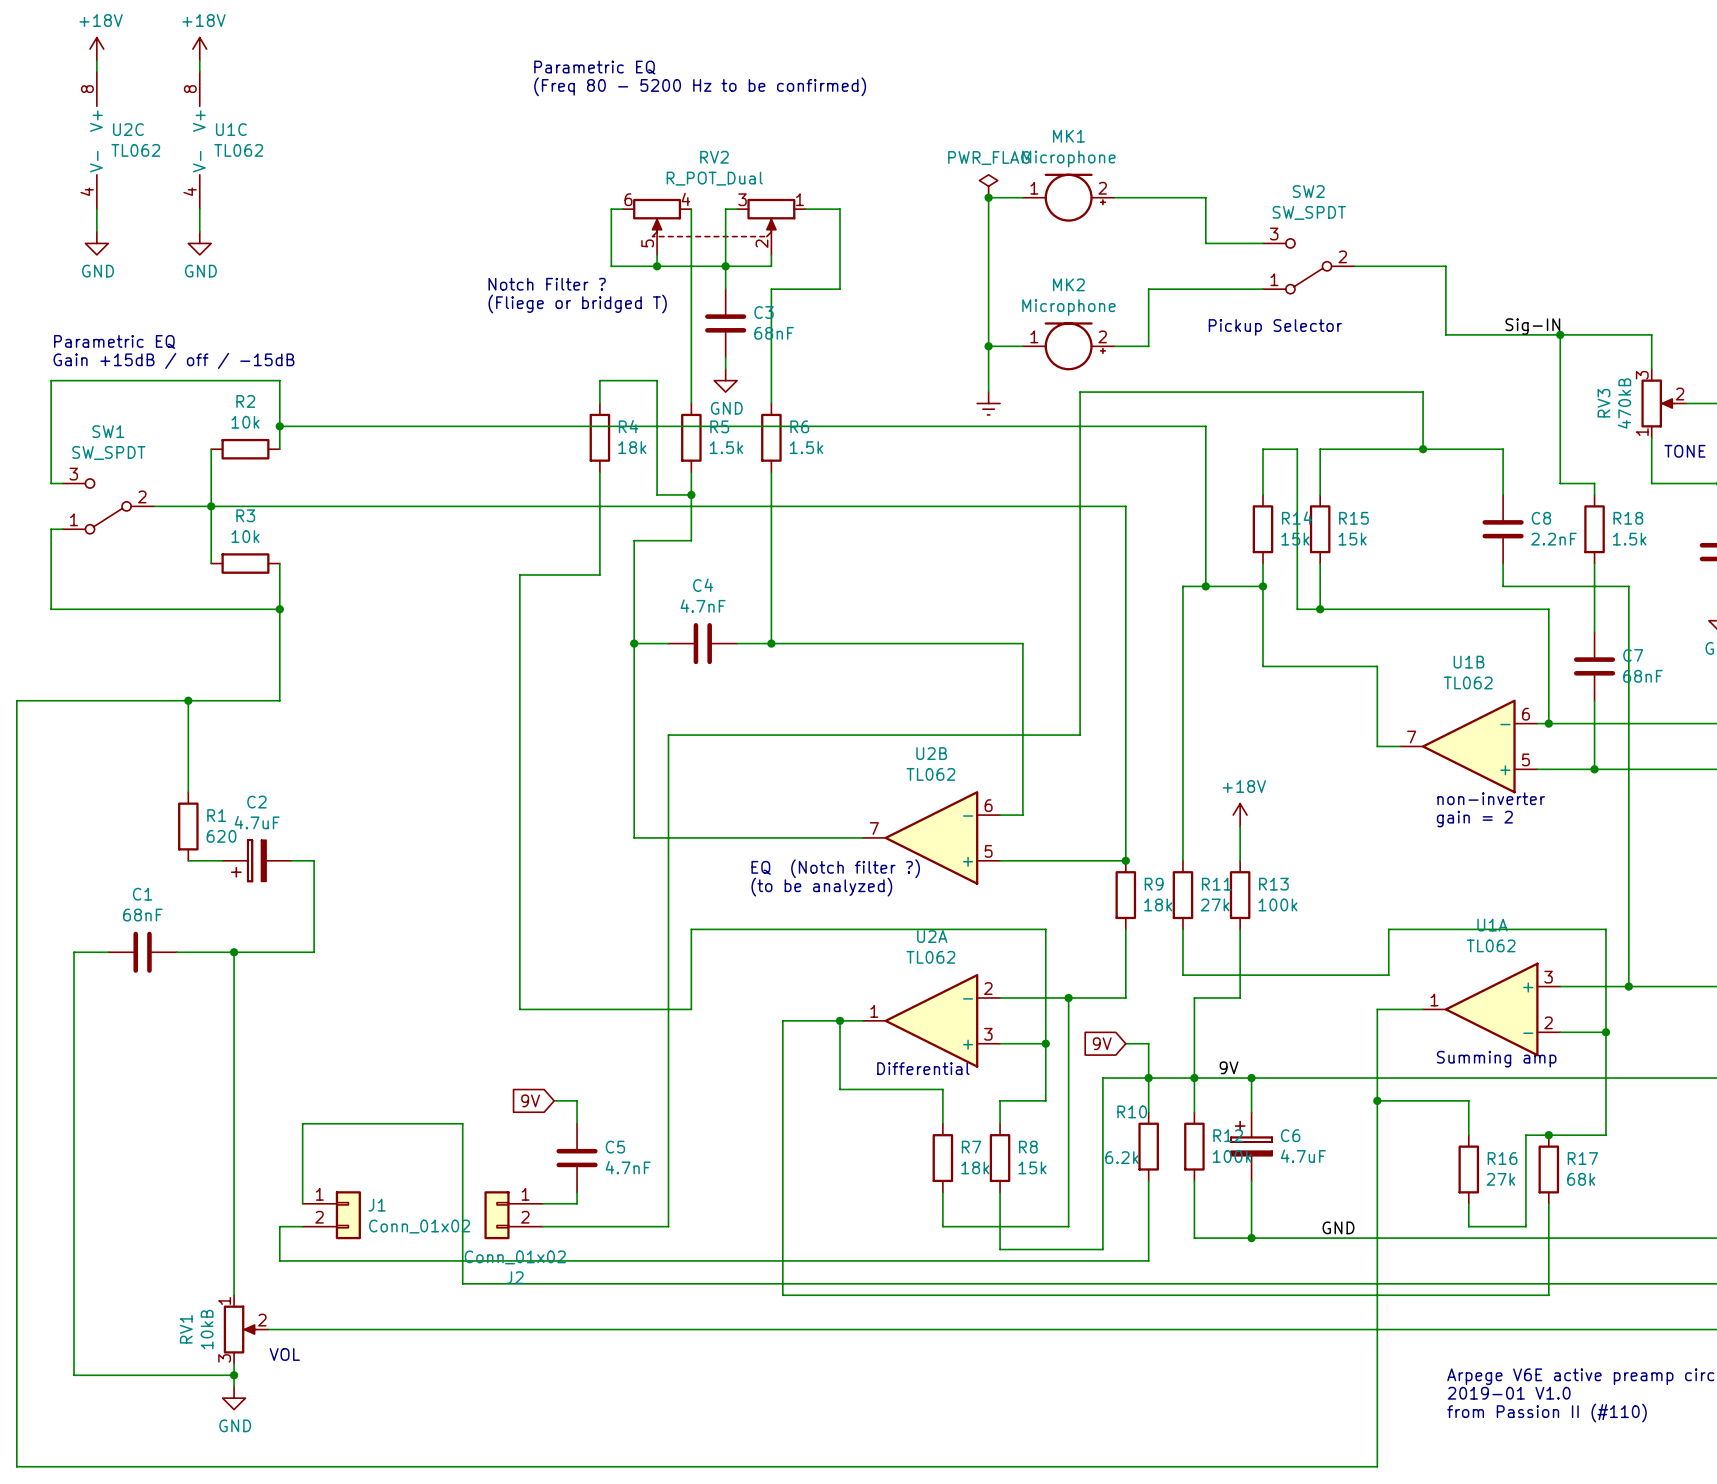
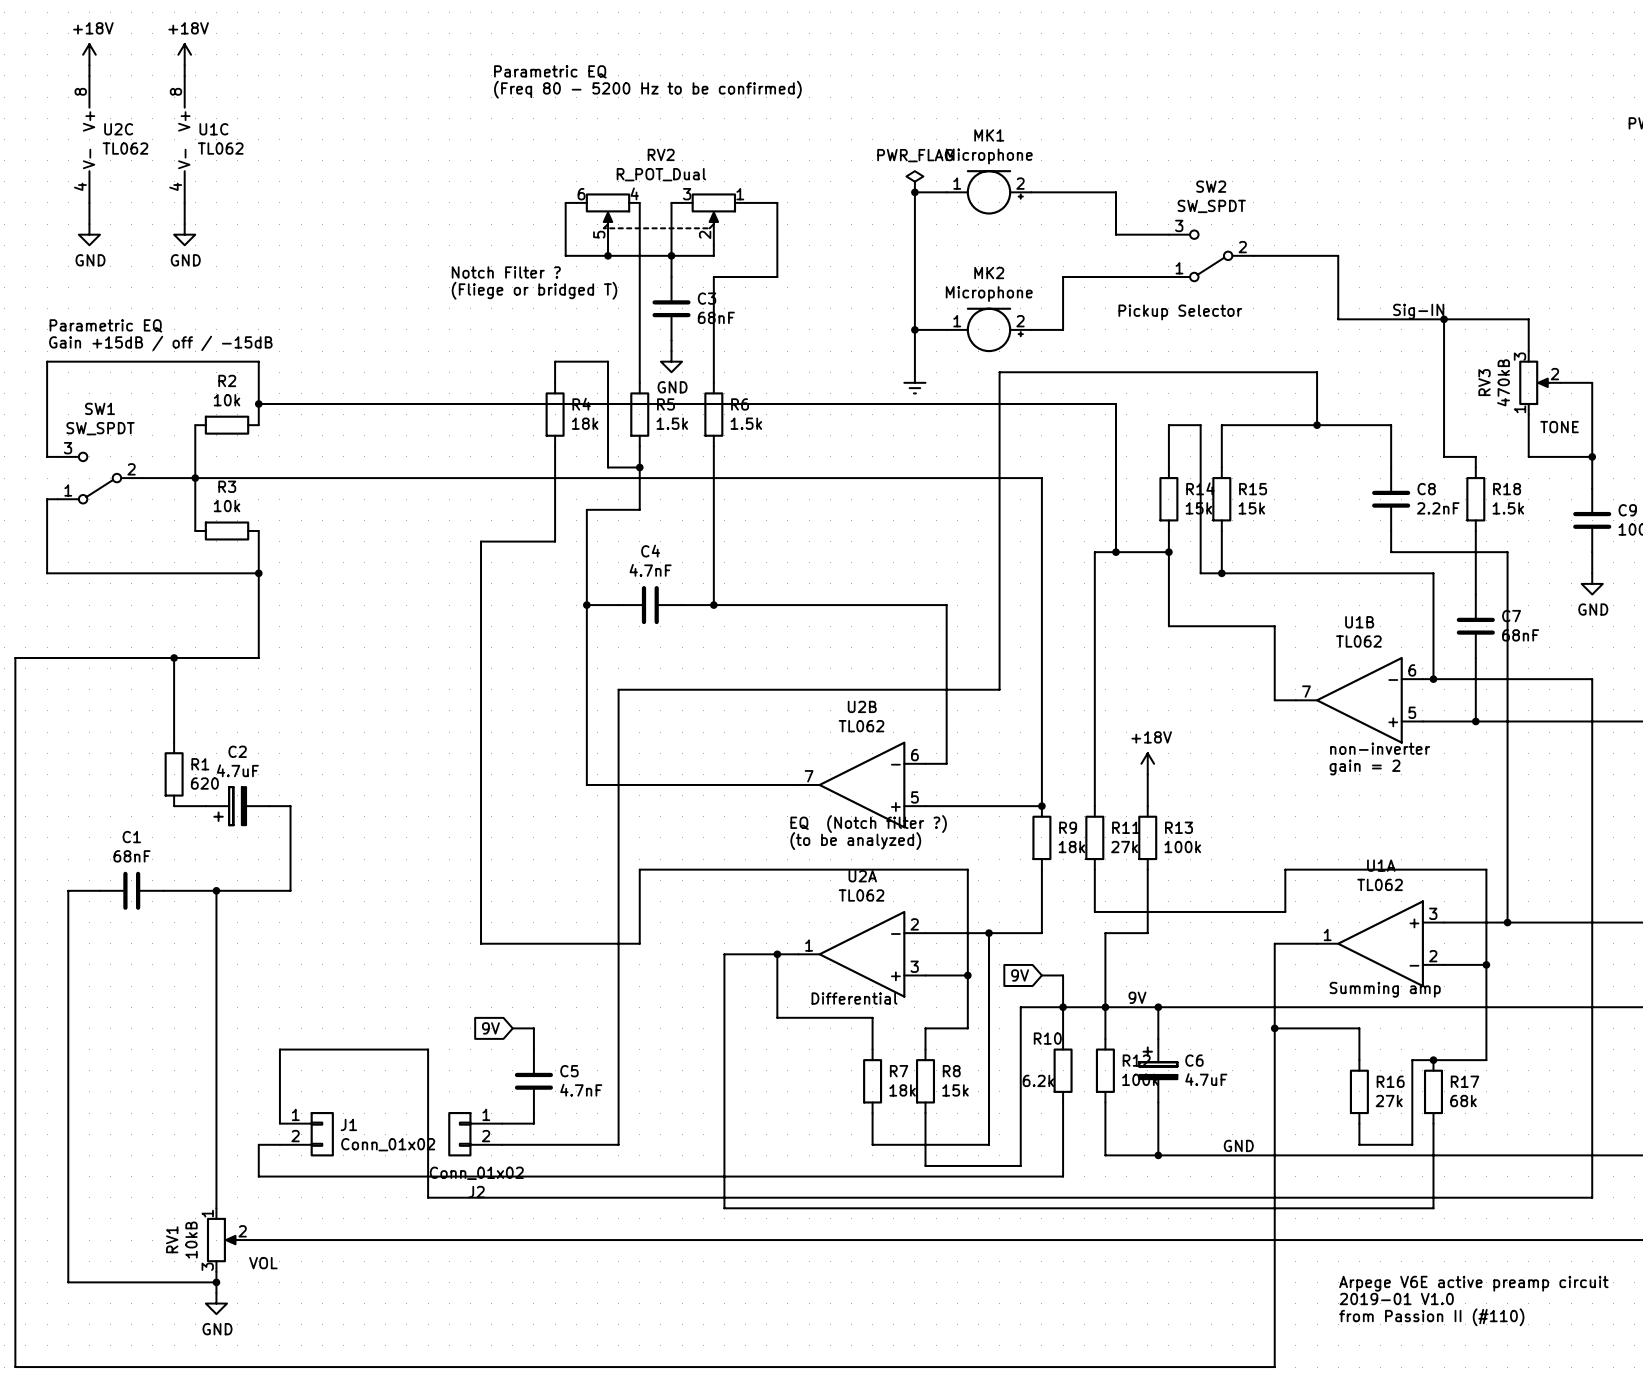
text position: EQ (Notch filter ?) (835, 868) -> EQ (Notch filter ?) (868, 824)
text position: (to be analyzed) (821, 887) -> (to be analyzed) (855, 841)

